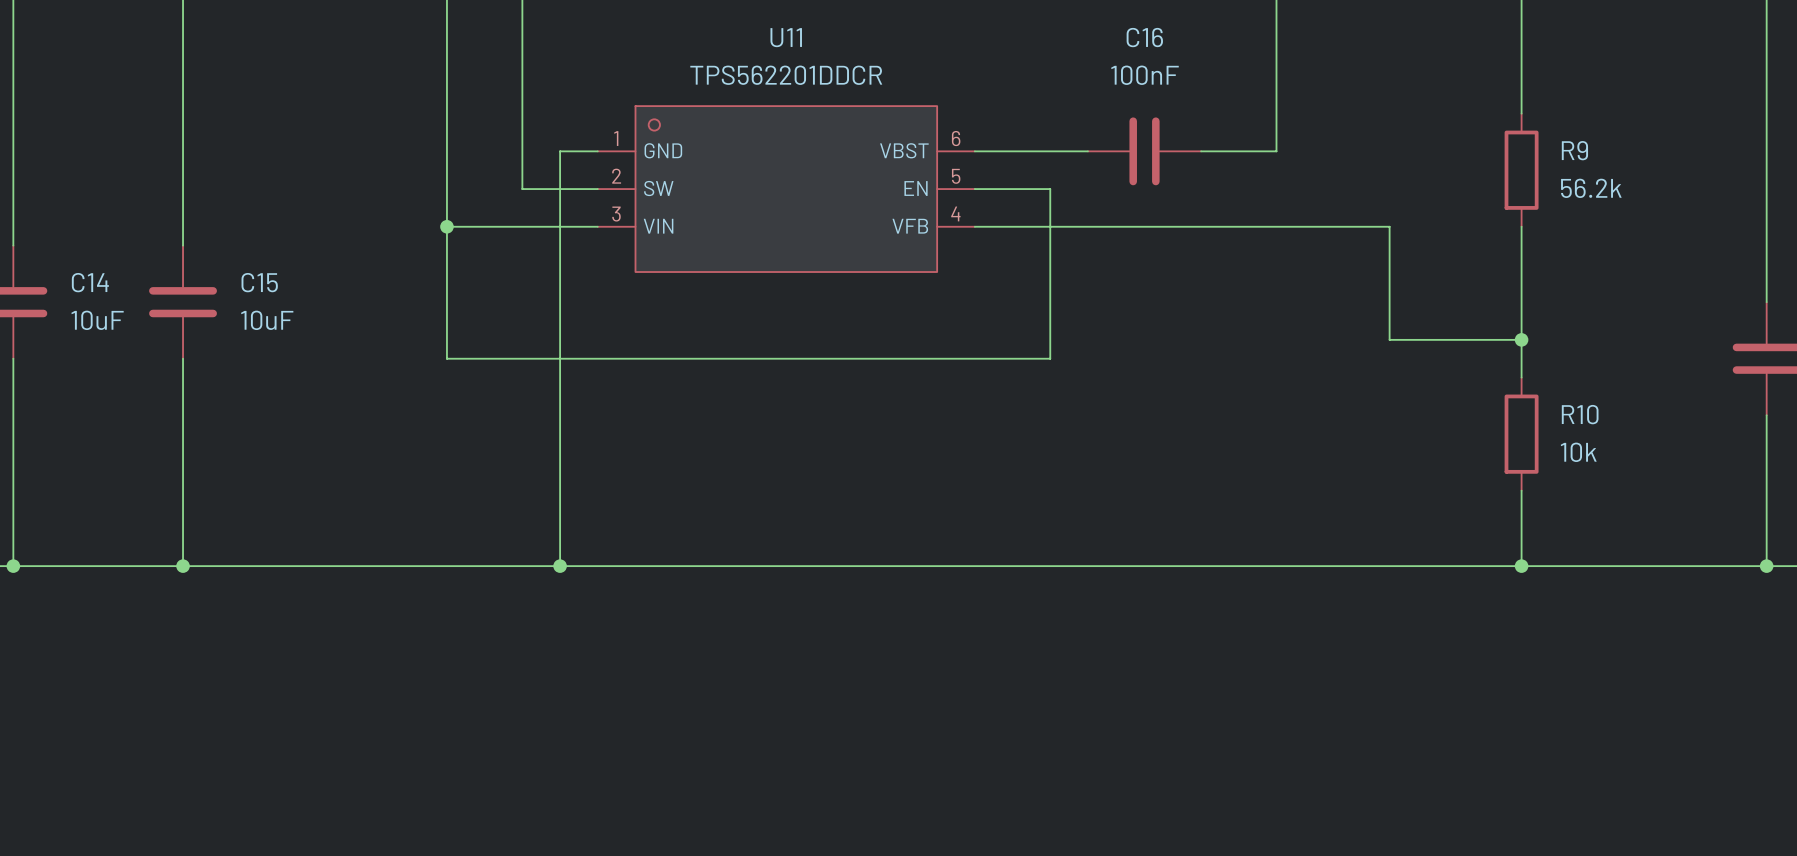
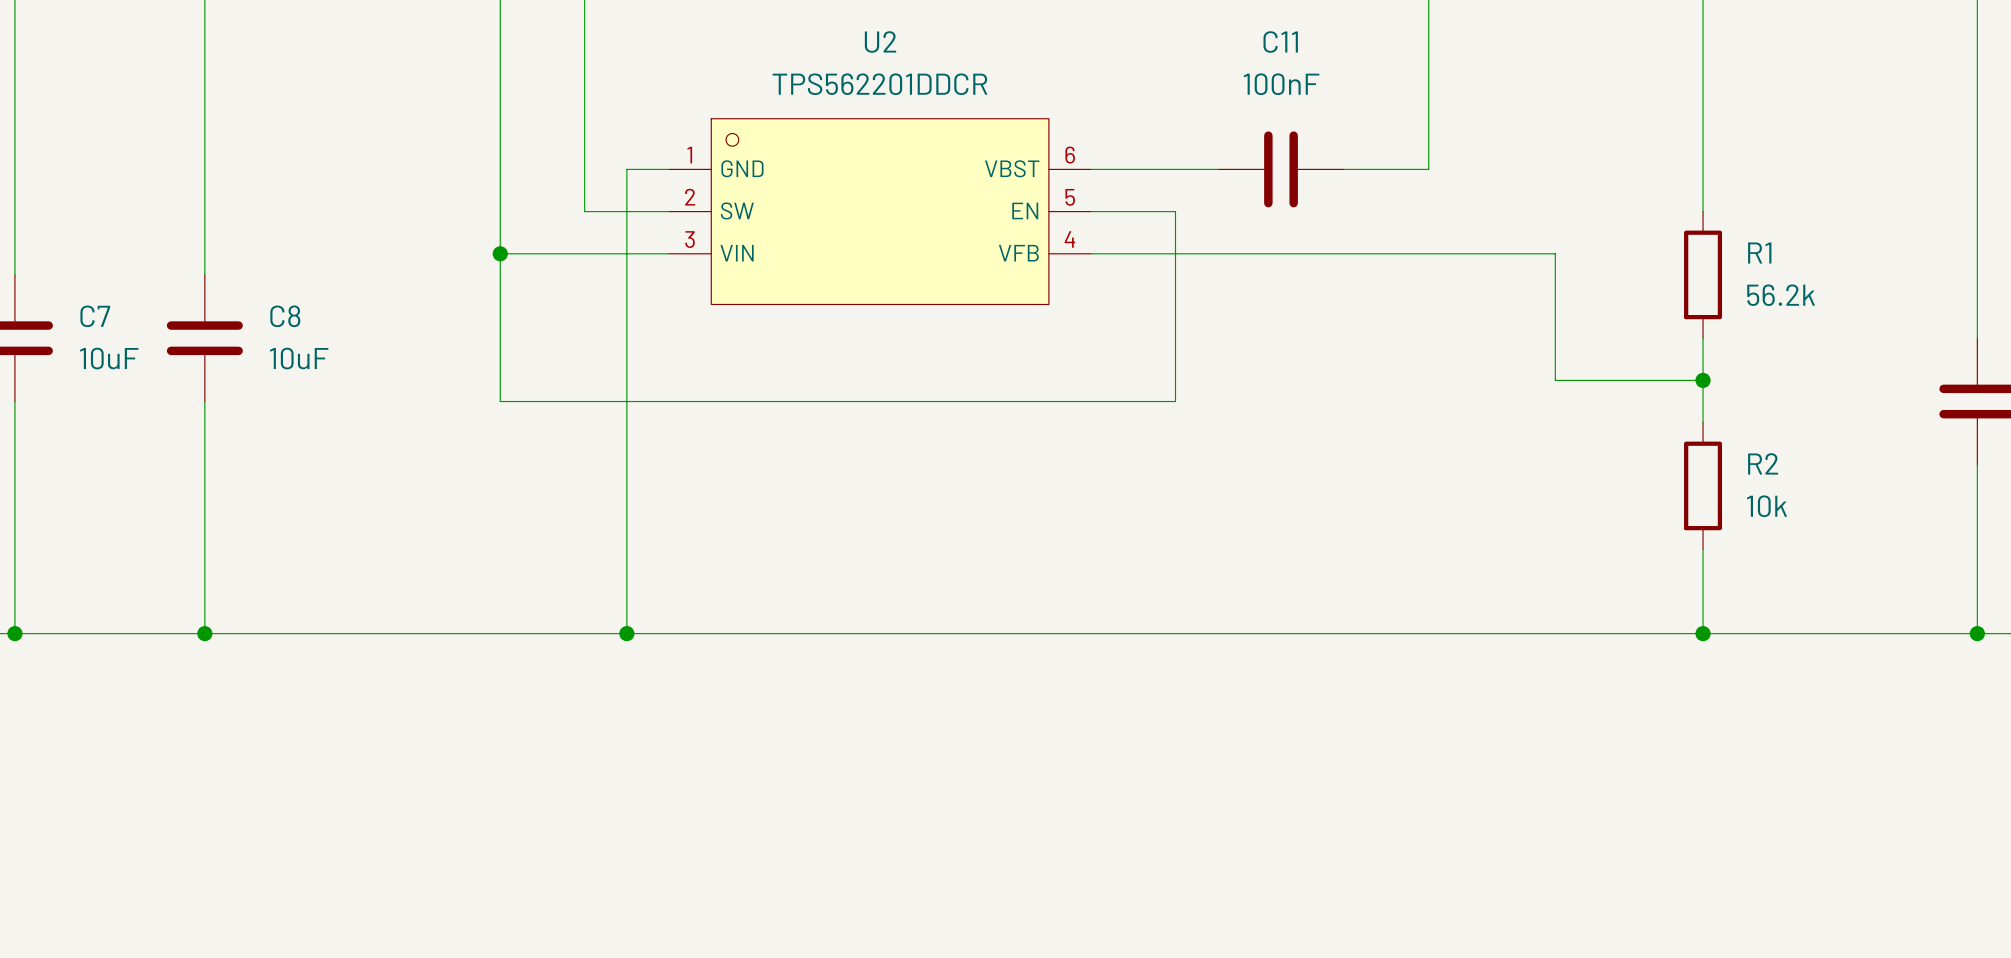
U11 name: U11 (786, 37) -> U2 (880, 42)
C16 name: C16 (1144, 37) -> C11 (1280, 42)
R9: 56.2k (1521, 170) -> none
wire: (1521, 226) (1521, 302) -> (1703, 127) (1703, 211)
R1: none -> 56.2k (1703, 274)
C14 name: C14 (90, 282) -> C7 (95, 316)
C15 name: C15 (259, 282) -> C8 (285, 316)
R10 name: R10 (1580, 414) -> R2 (1763, 463)

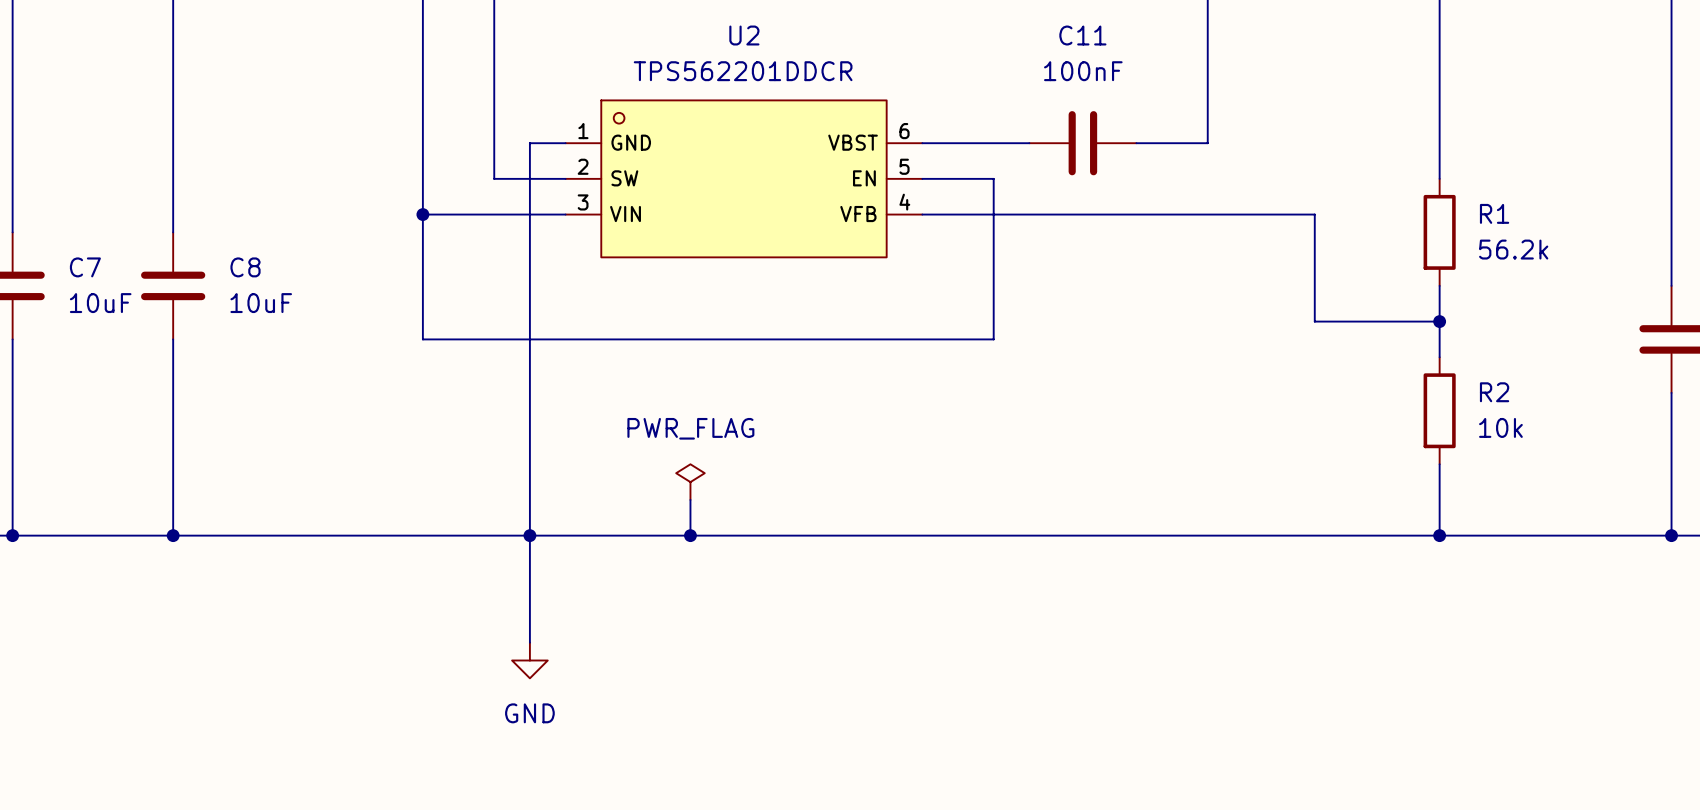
power symbol: none -> PWR_FLAG (690, 482)
wire: none -> (690, 499) (690, 535)
wire: none -> (529, 535) (529, 642)
junction: none -> (690, 535)
power symbol: none -> GND (529, 660)

